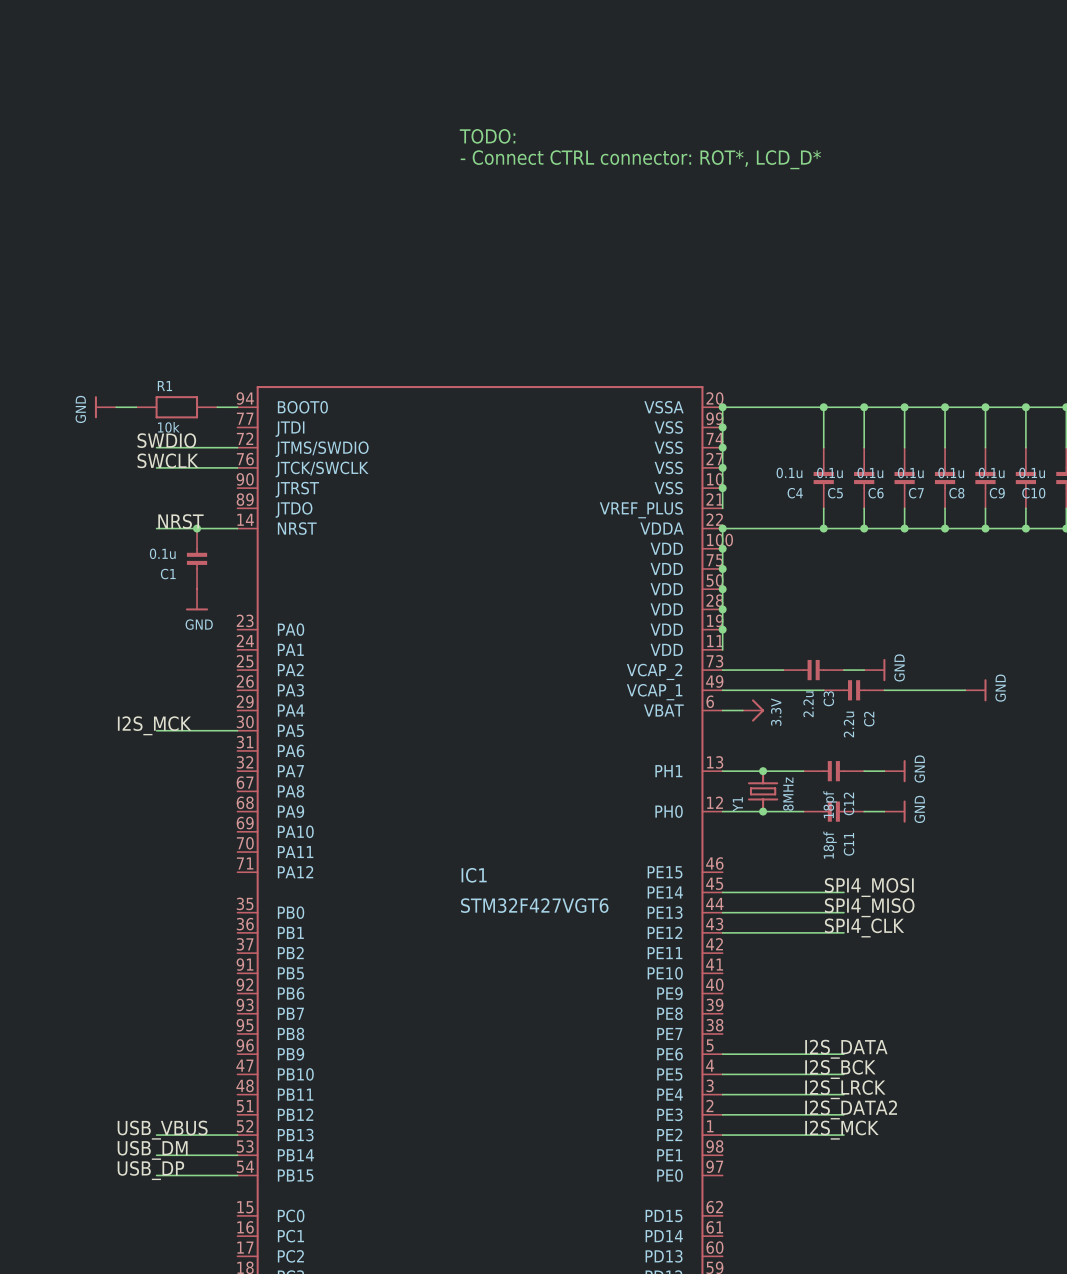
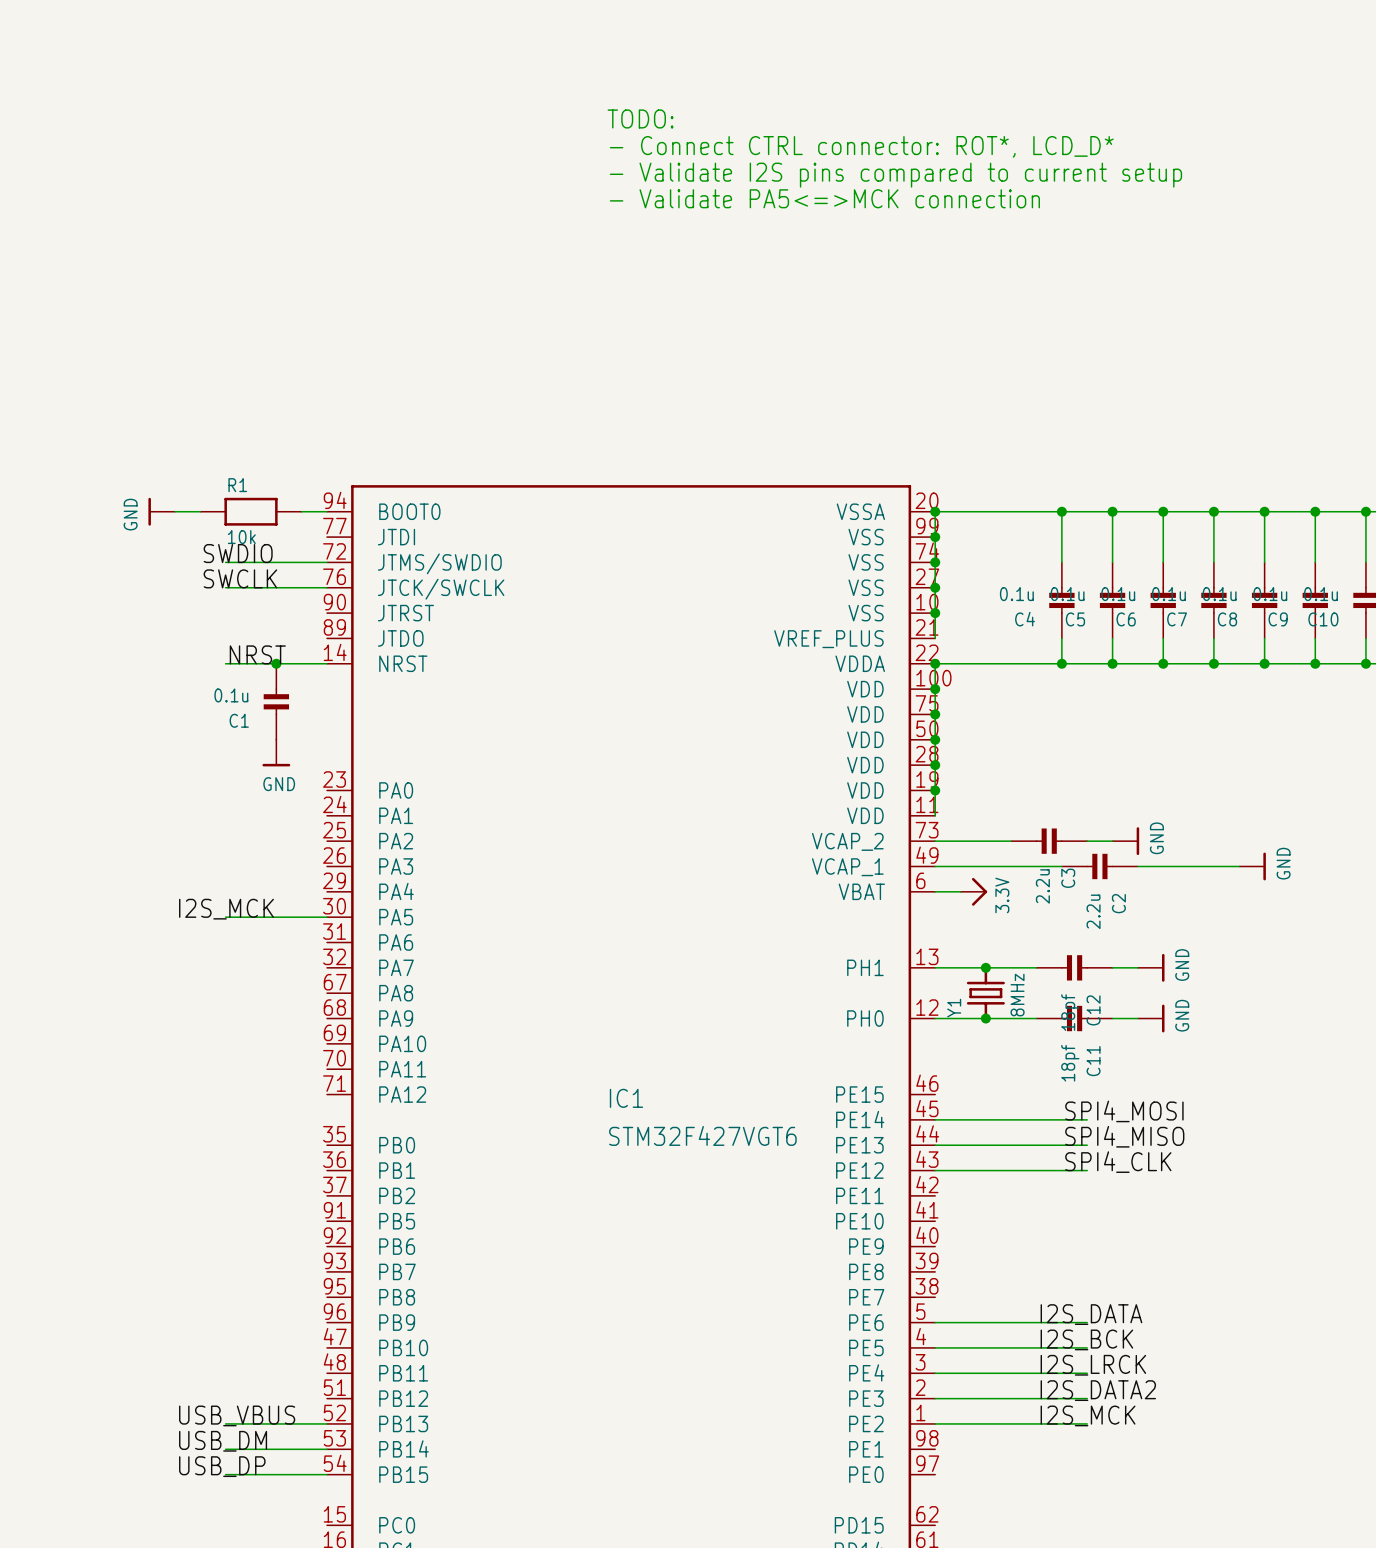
text: none -> TODO: (640, 118)
text: none -> - Connect CTRL connector: ROT*, LCD_D* (861, 146)
text: TODO: (487, 136) -> - Validate I2S pins compared to current setup (895, 175)
text: - Connect CTRL connector: ROT*, LCD_D* (640, 159) -> - Validate PA5<=>MCK connection (824, 198)

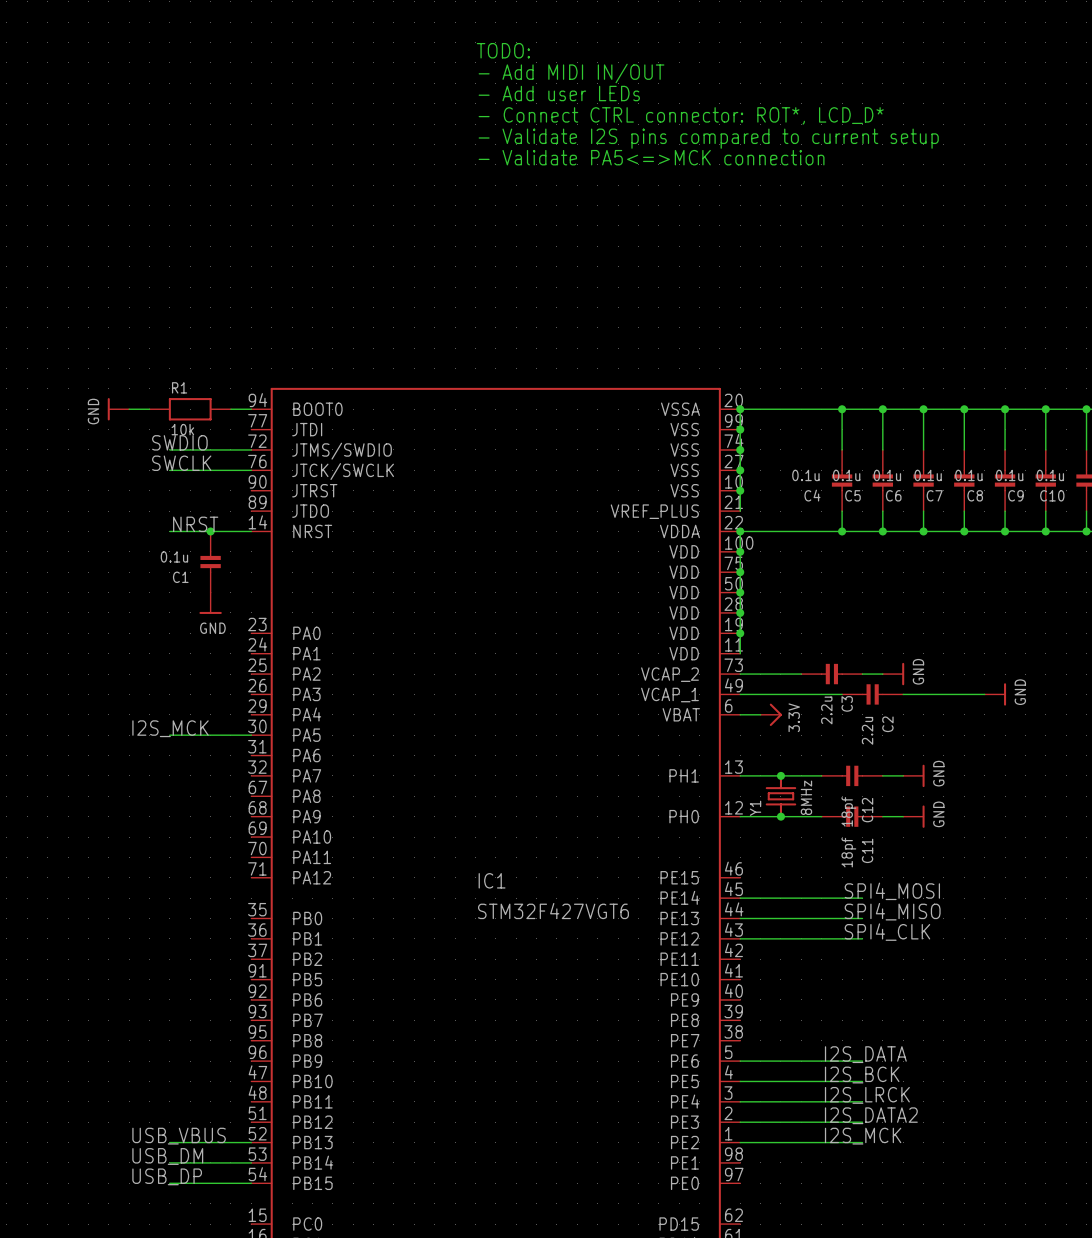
text: none -> TODO: (503, 50)
text: none -> - Add MIDI IN/OUT (571, 73)
text: TODO: (640, 118) -> - Add user LEDs (559, 93)

